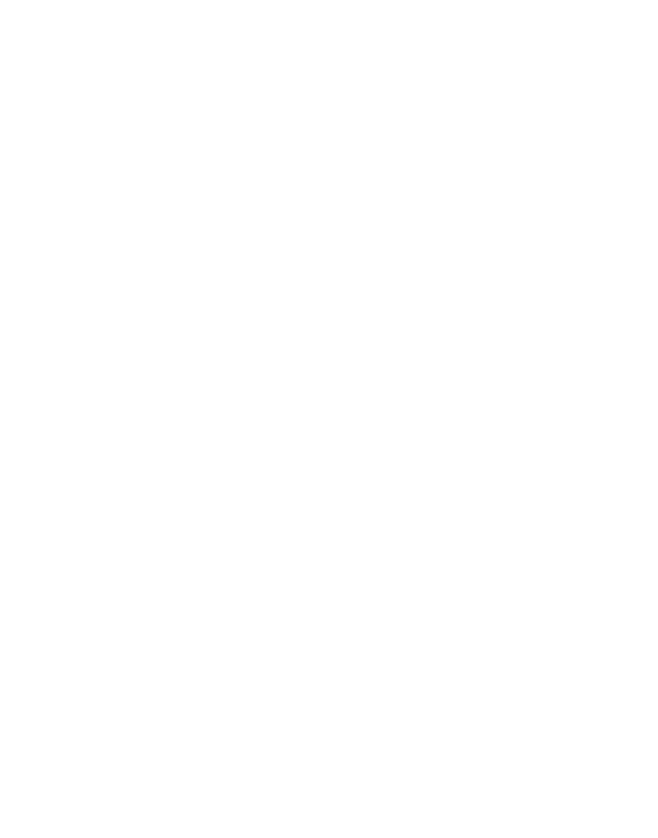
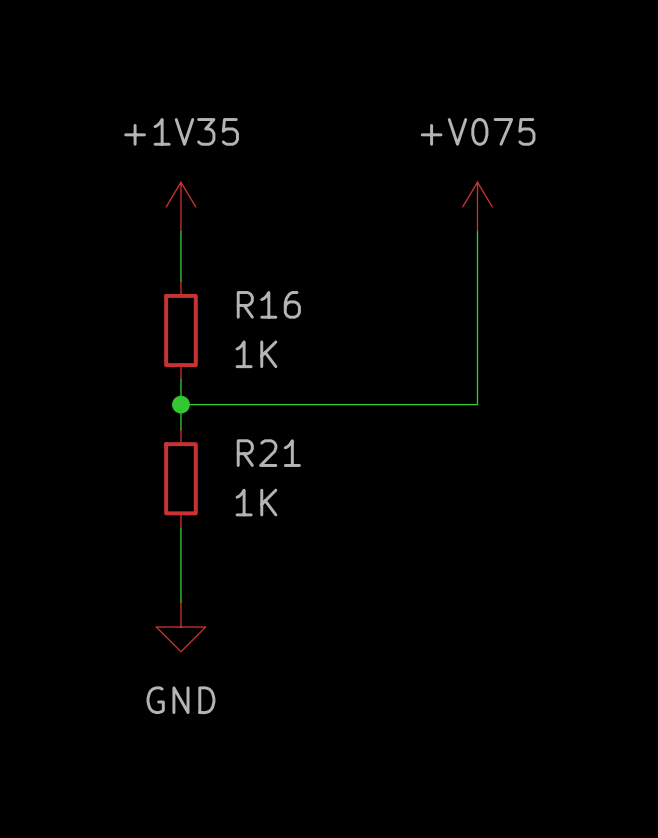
power symbol: none -> +1V35 (180, 206)
power symbol: none -> +V075 (477, 206)
wire: none -> (180, 231) (180, 281)
wire: none -> (477, 231) (477, 404) (180, 404)
R16: none -> 1K (180, 330)
wire: none -> (180, 379) (180, 429)
junction: none -> (180, 404)
R21: none -> 1K (180, 478)
wire: none -> (180, 528) (180, 602)
power symbol: none -> GND (180, 627)

